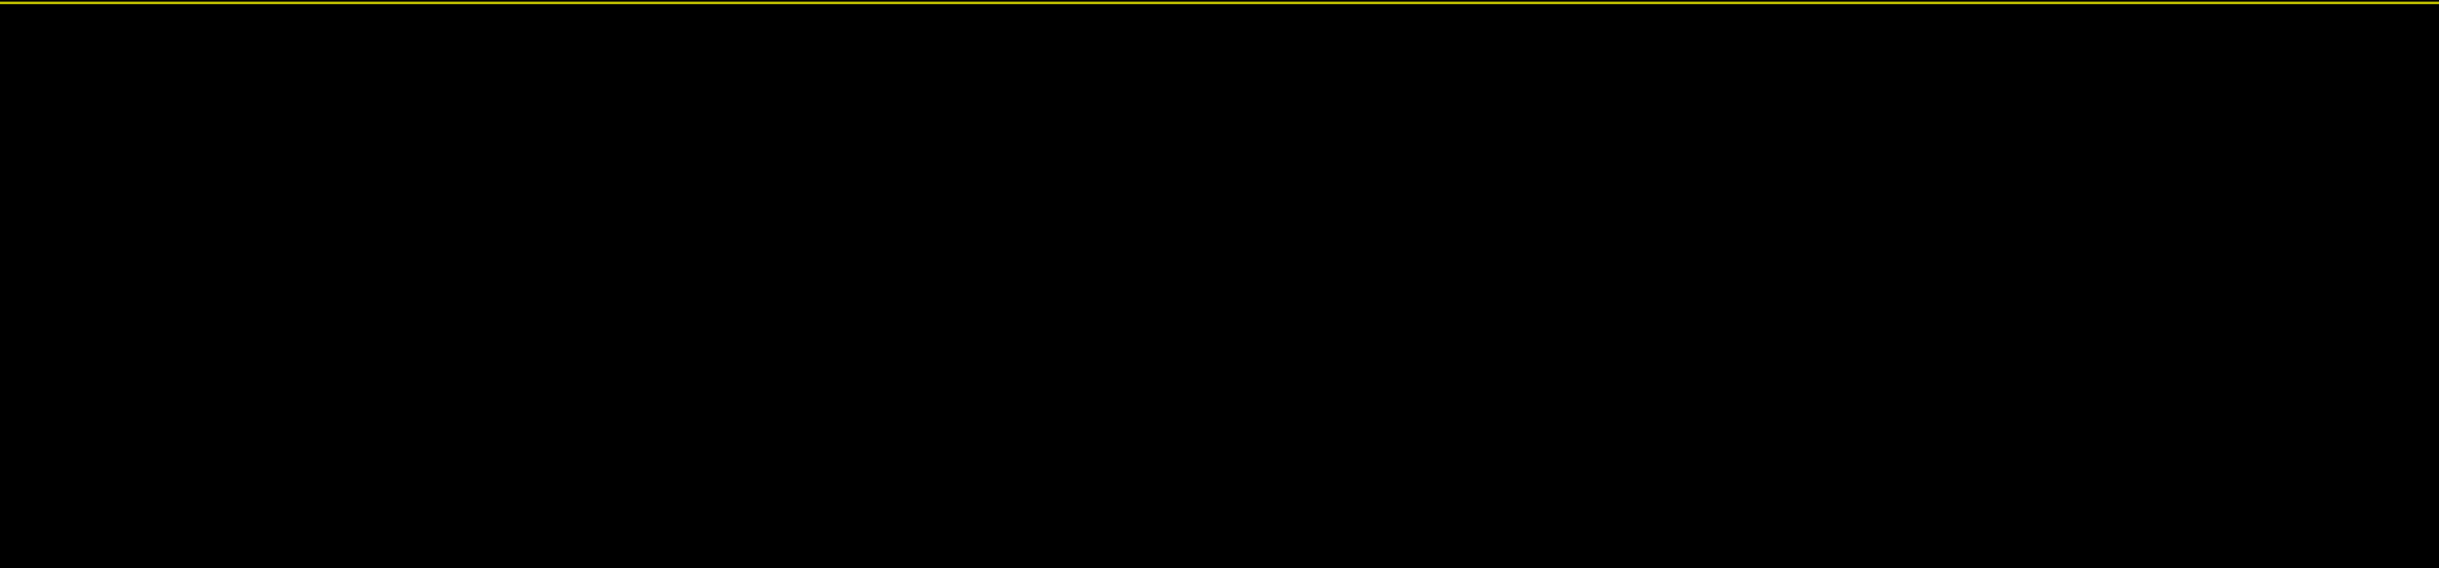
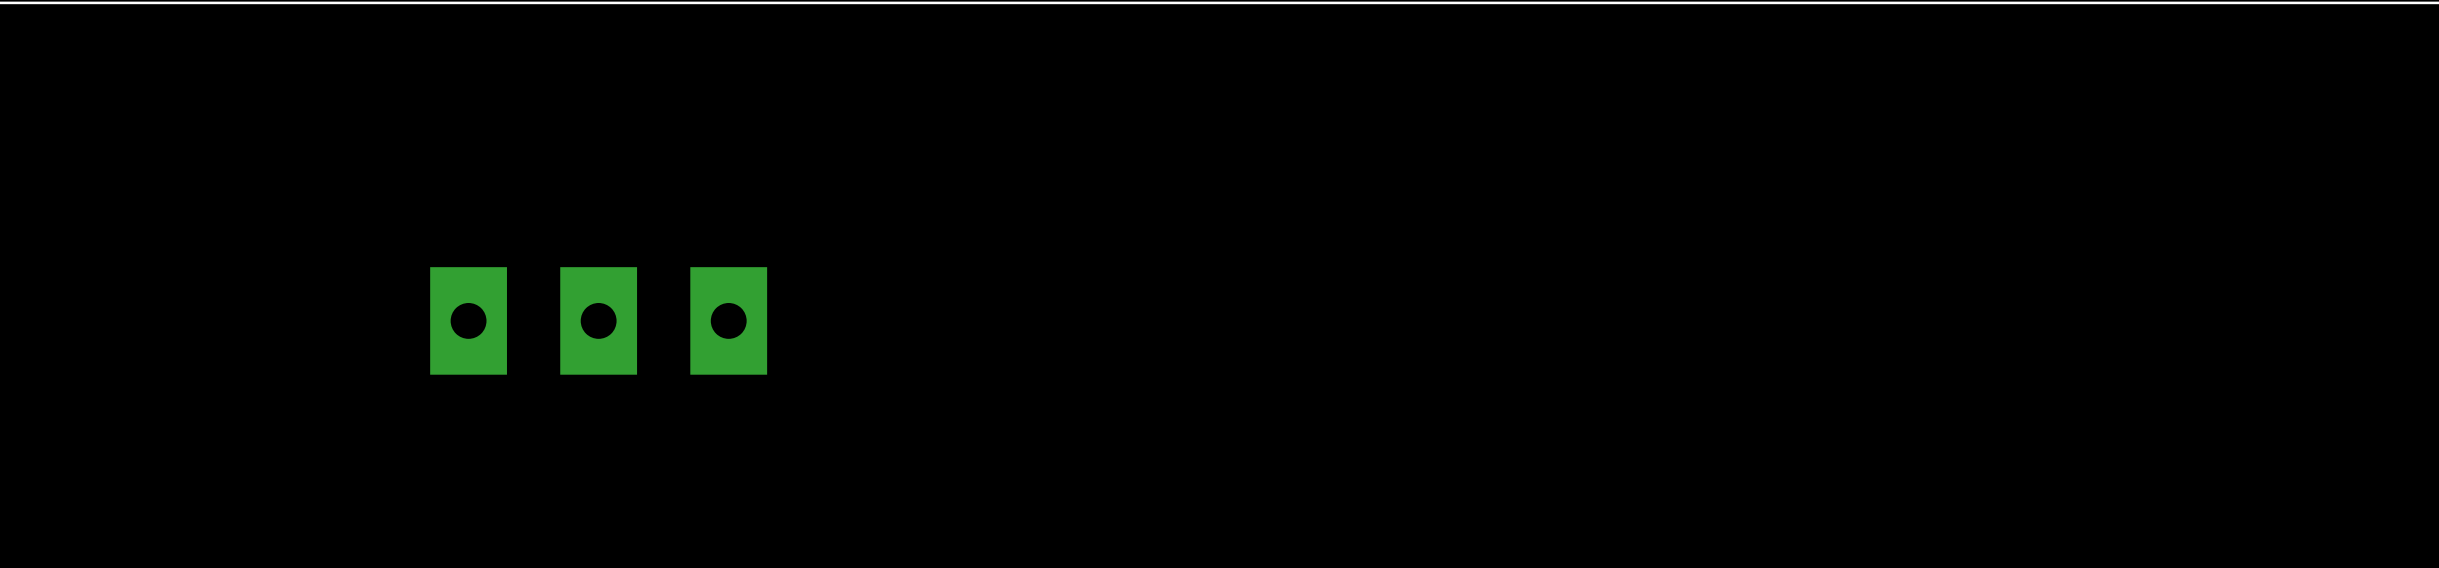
part: none -> (598, 320)

